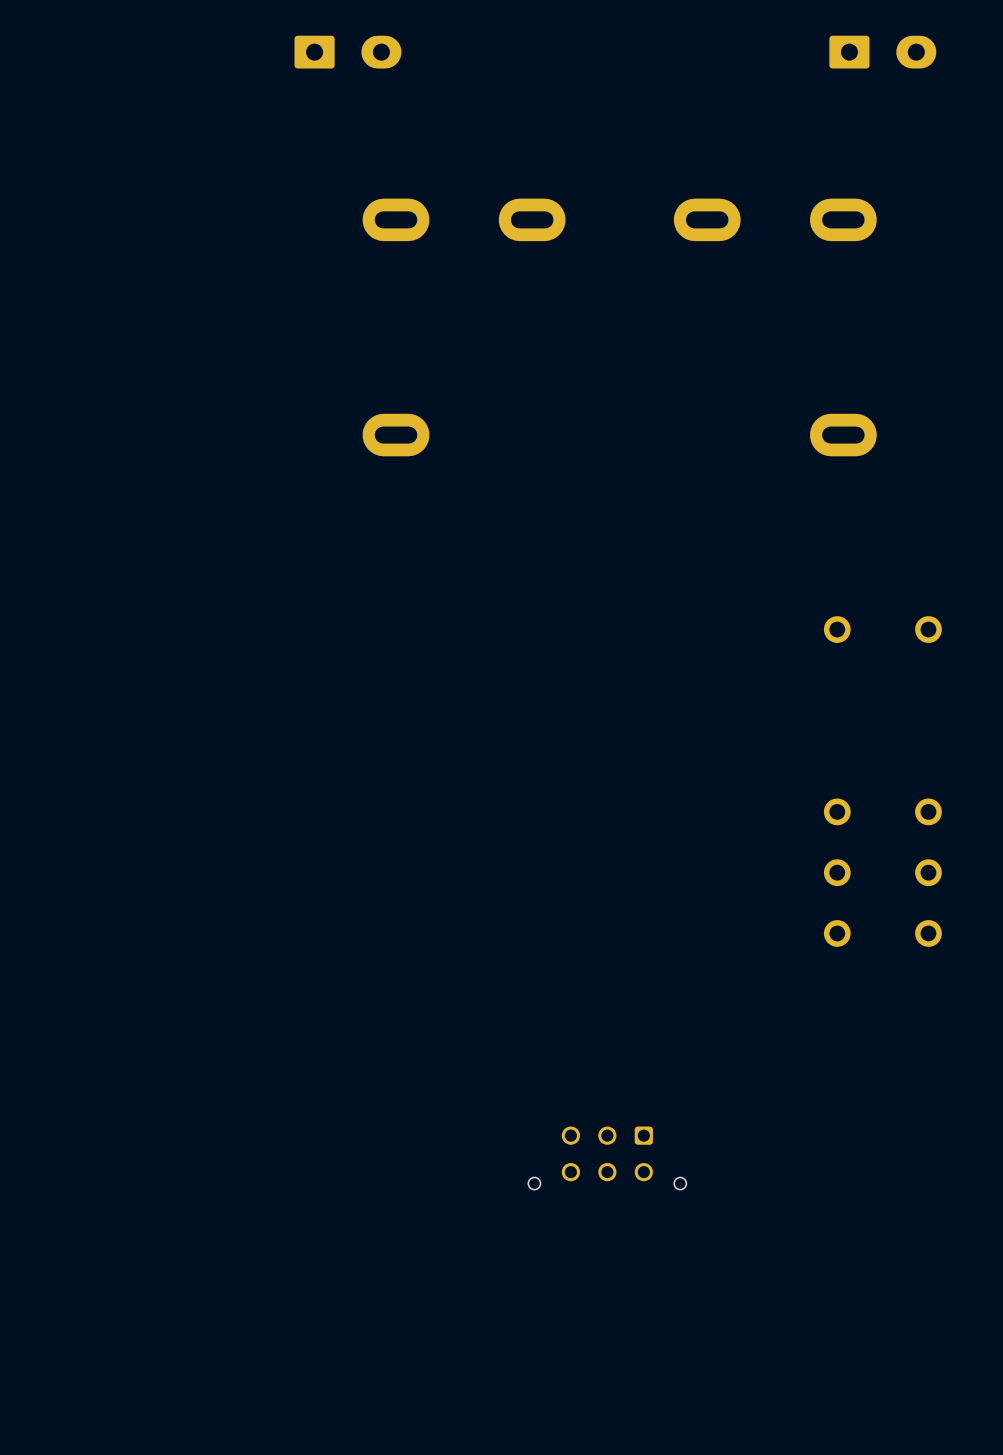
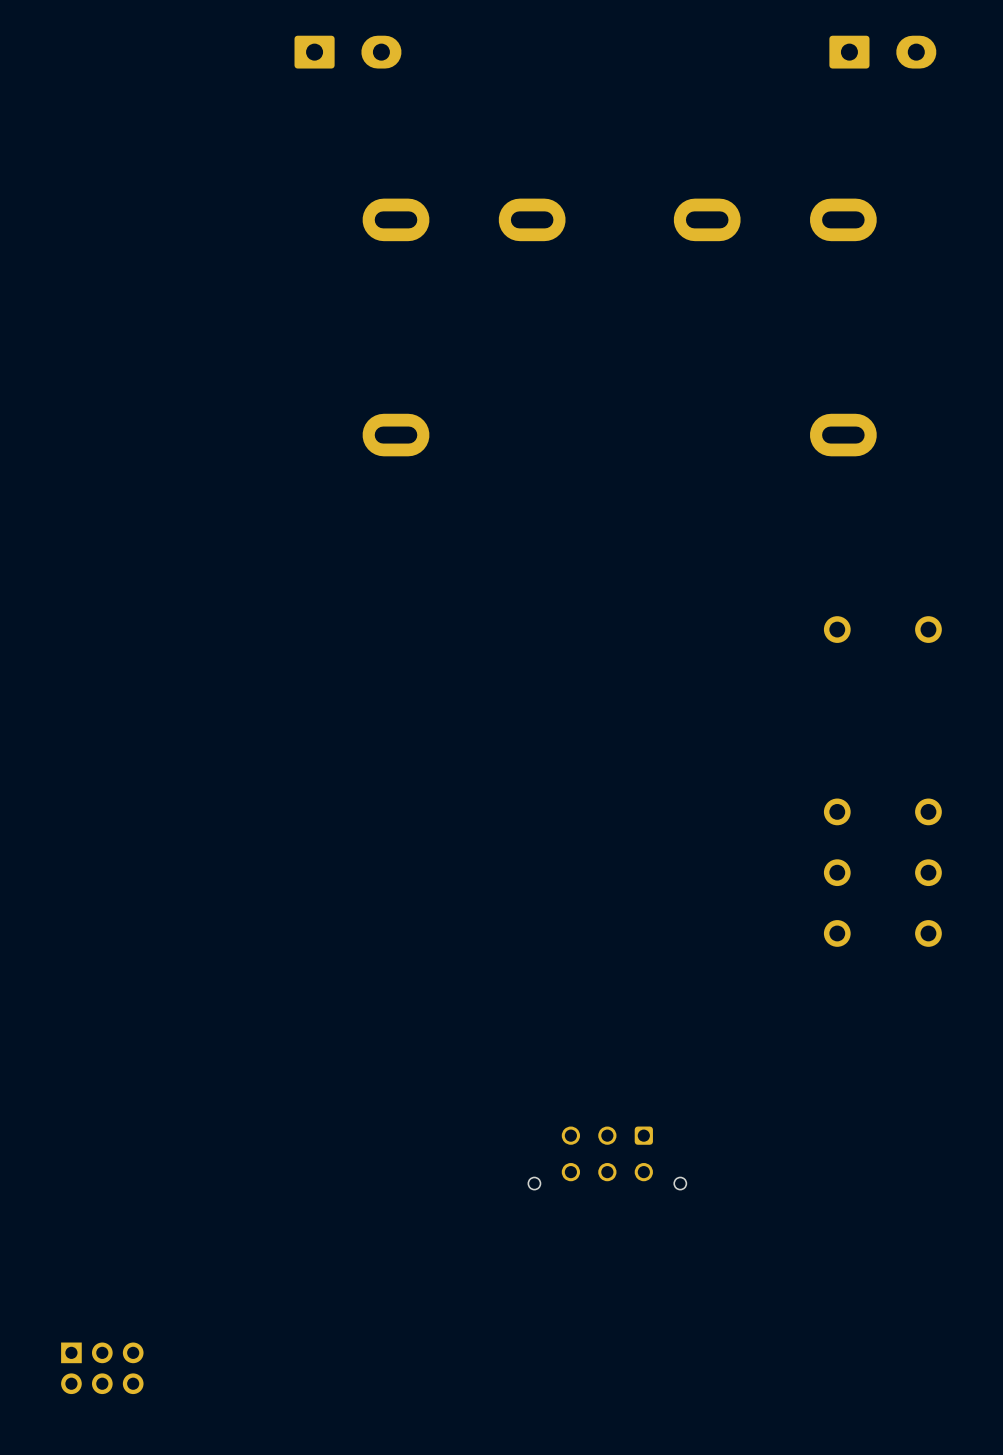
part: none -> (102, 1368)

